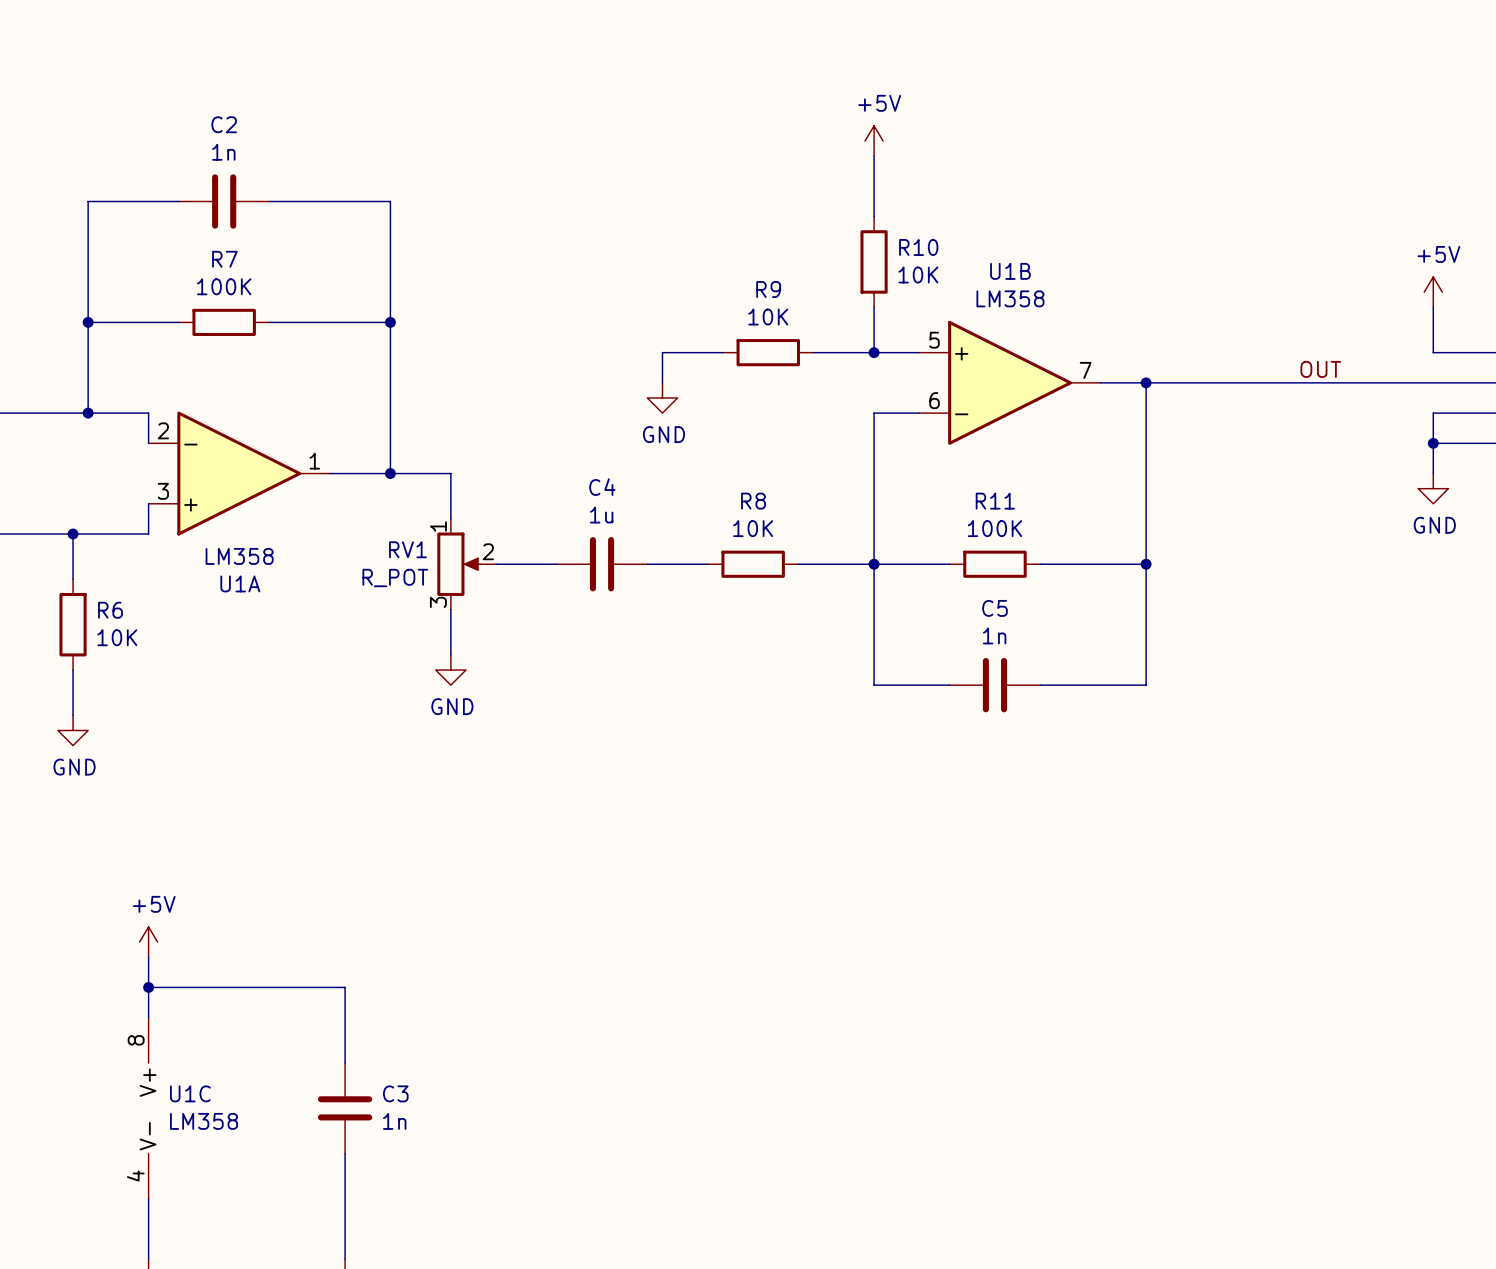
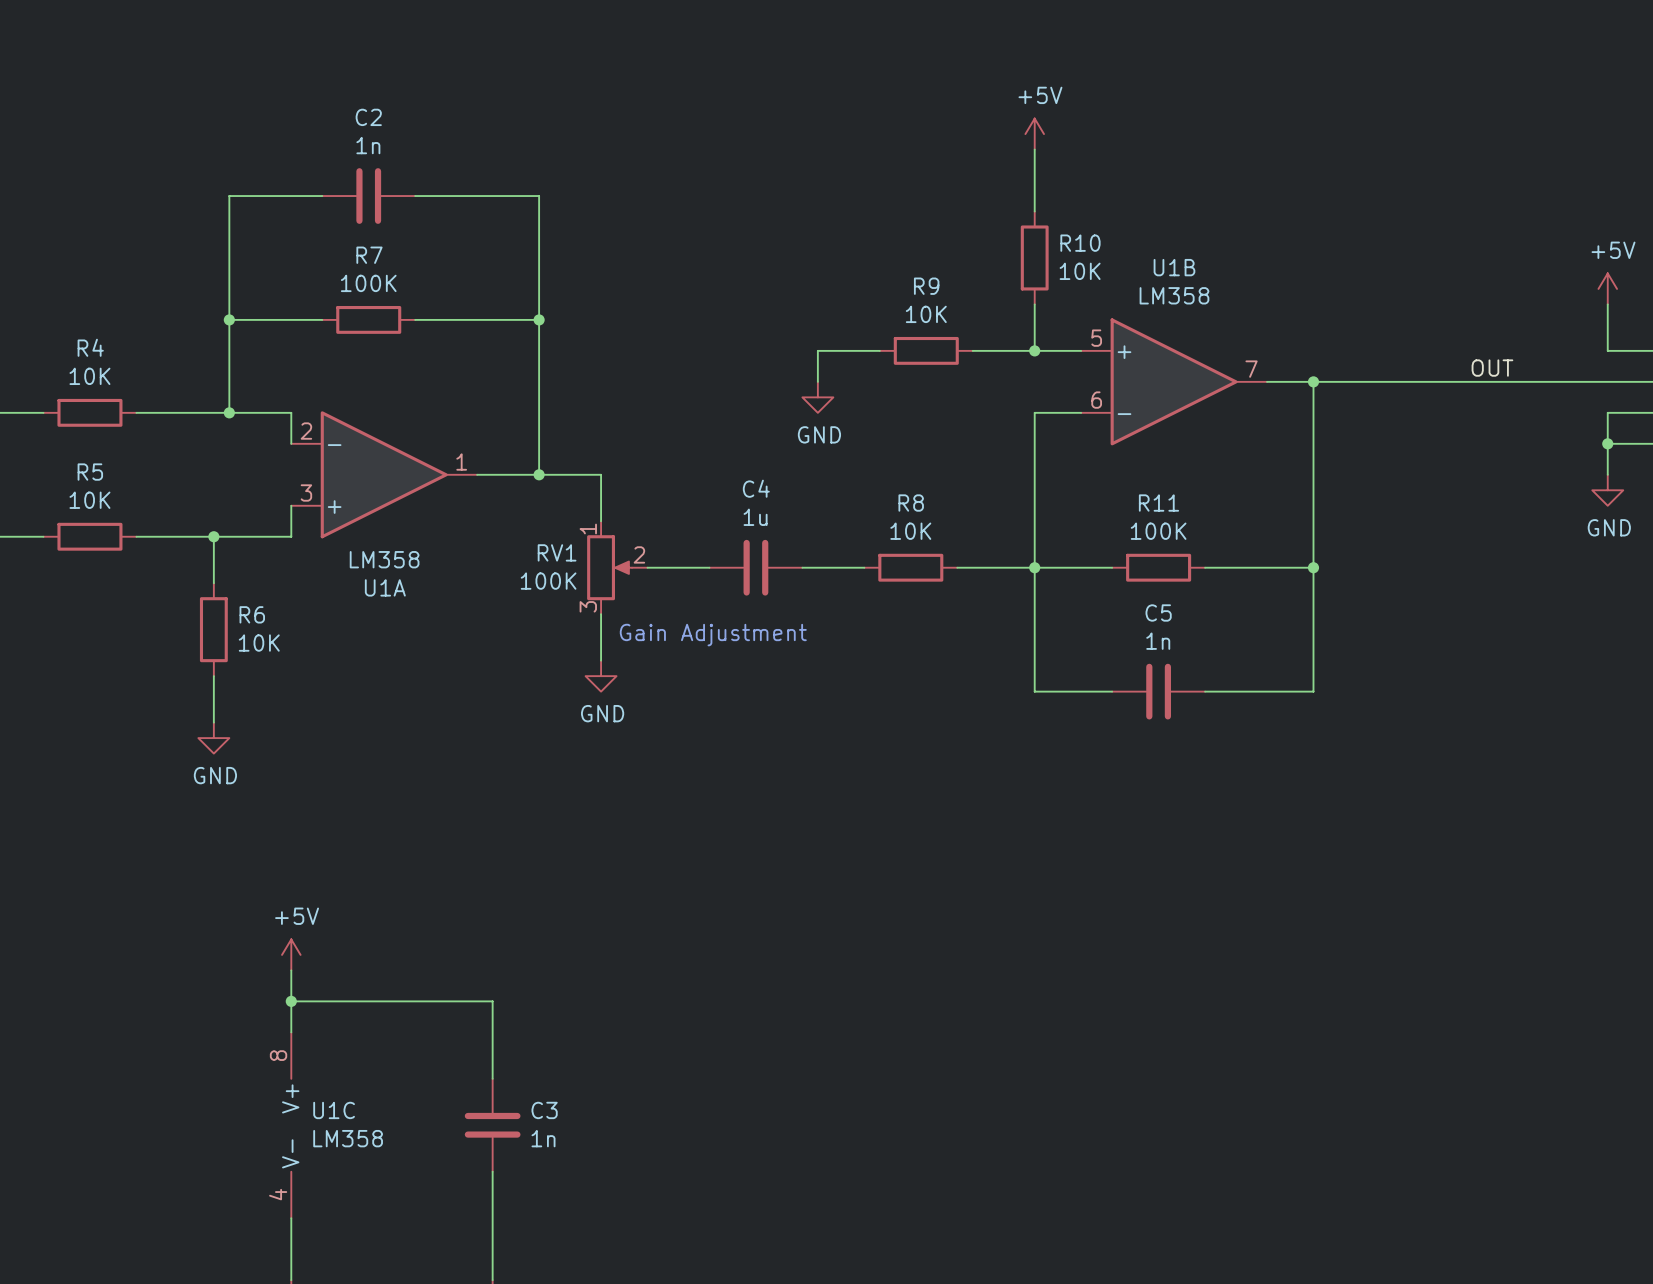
RV1 value: R_POT (395, 577) -> 100K (548, 581)
text: none -> Gain Adjustment (713, 635)

